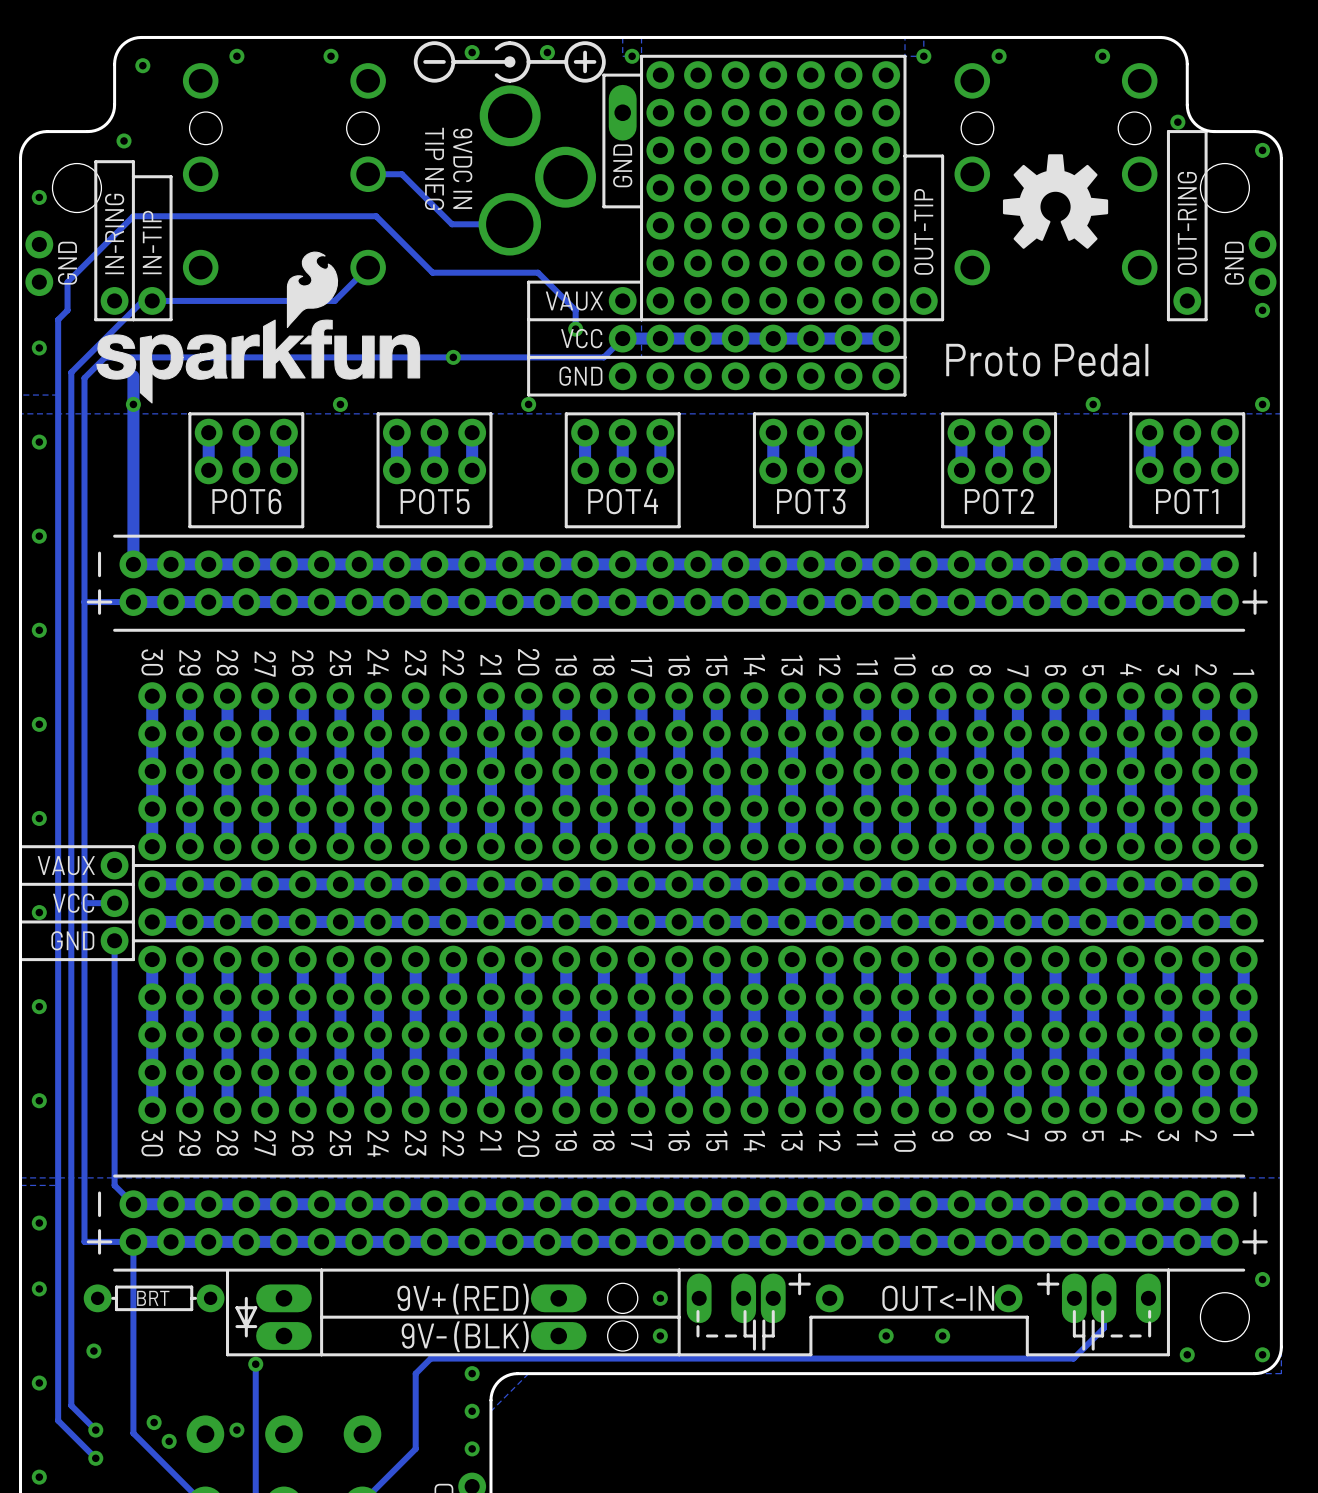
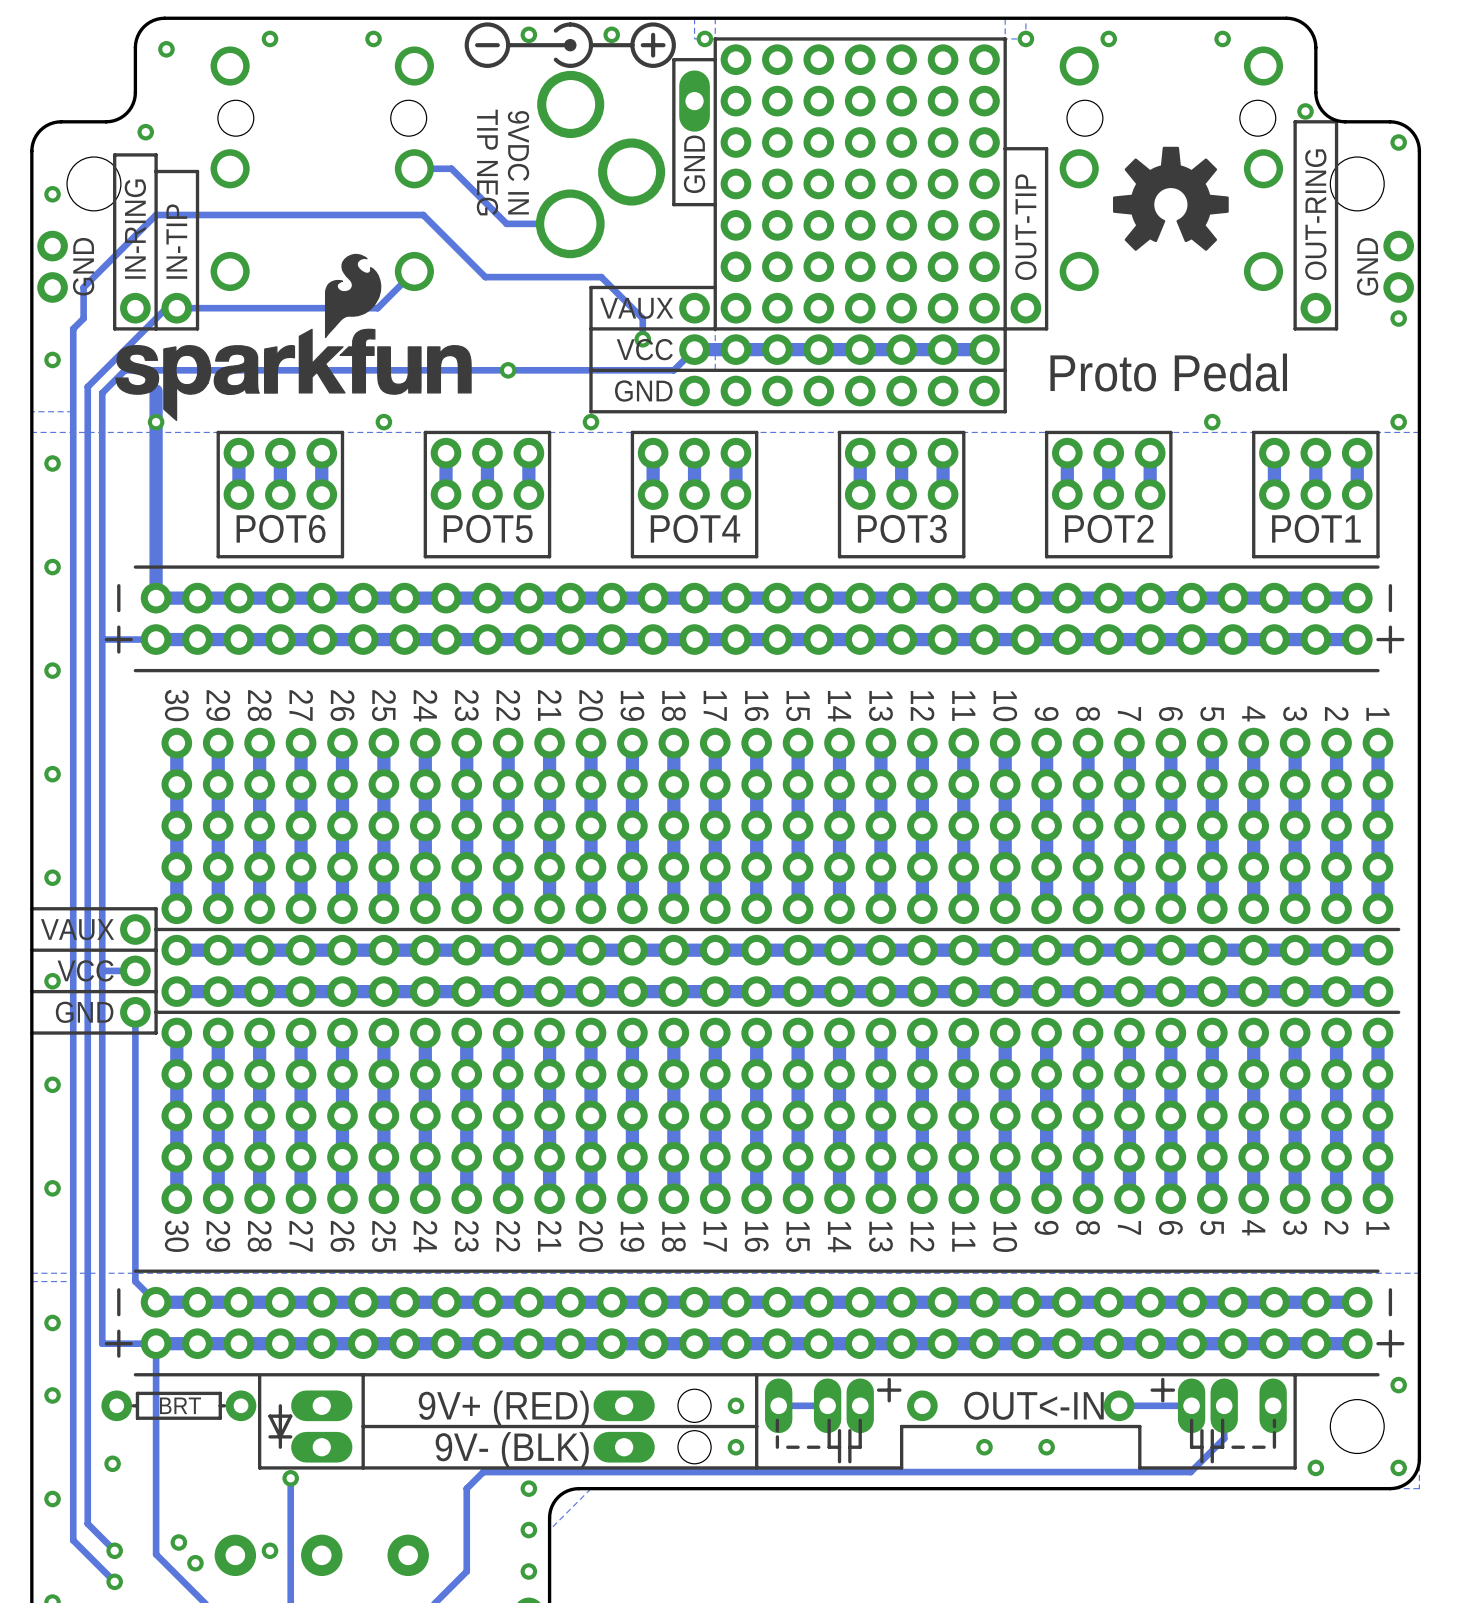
track: none -> (827, 1405) (778, 1405)
track: none -> (1191, 1405) (1119, 1405)

